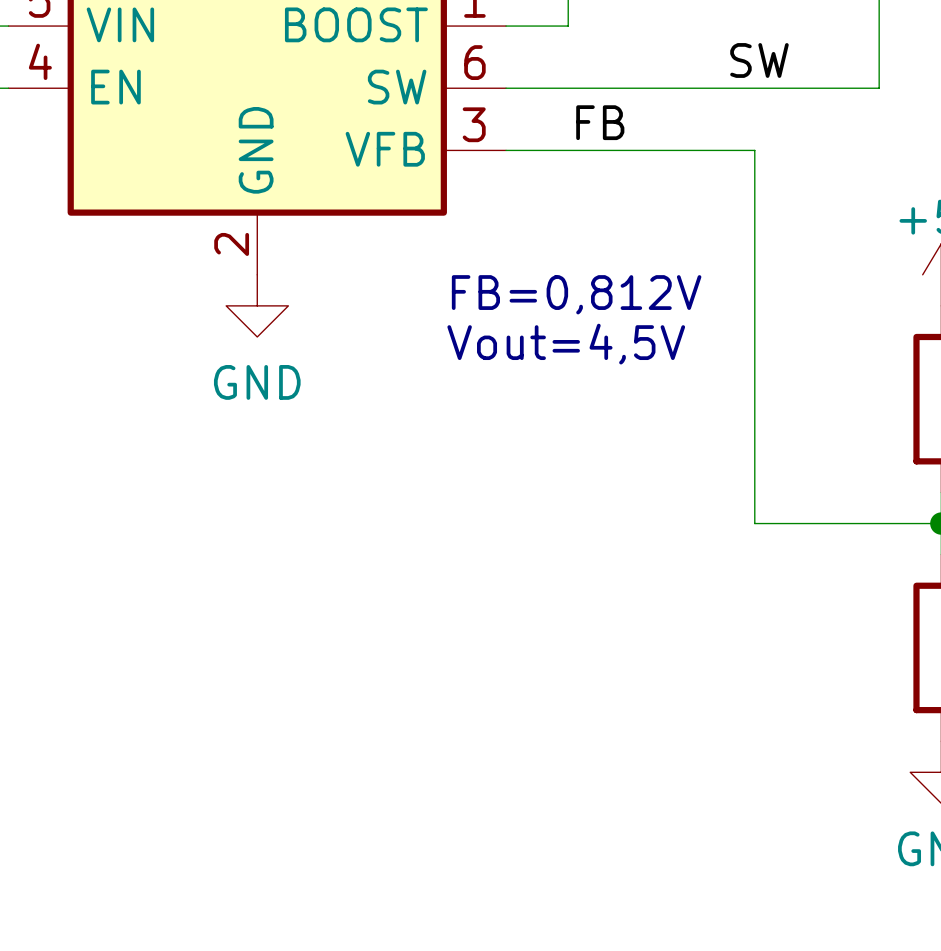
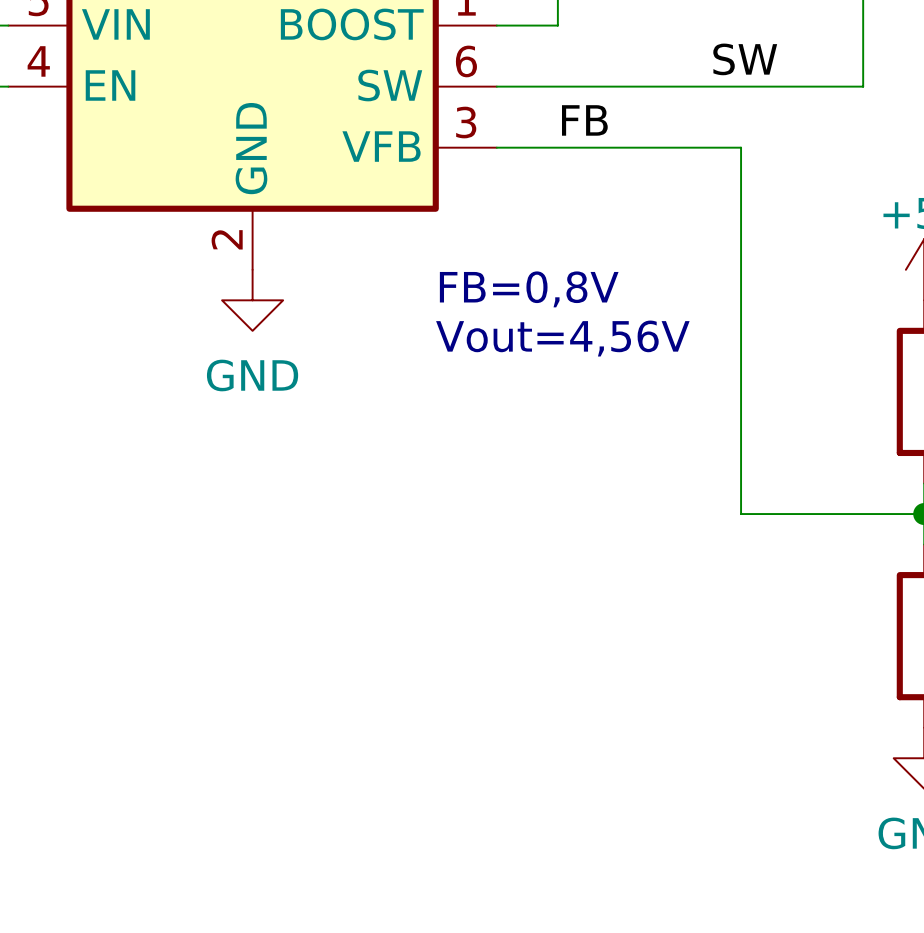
text: FB=0,812V (576, 294) -> FB=0,8V (529, 289)
text: Vout=4,5V (566, 344) -> Vout=4,56V (562, 338)

